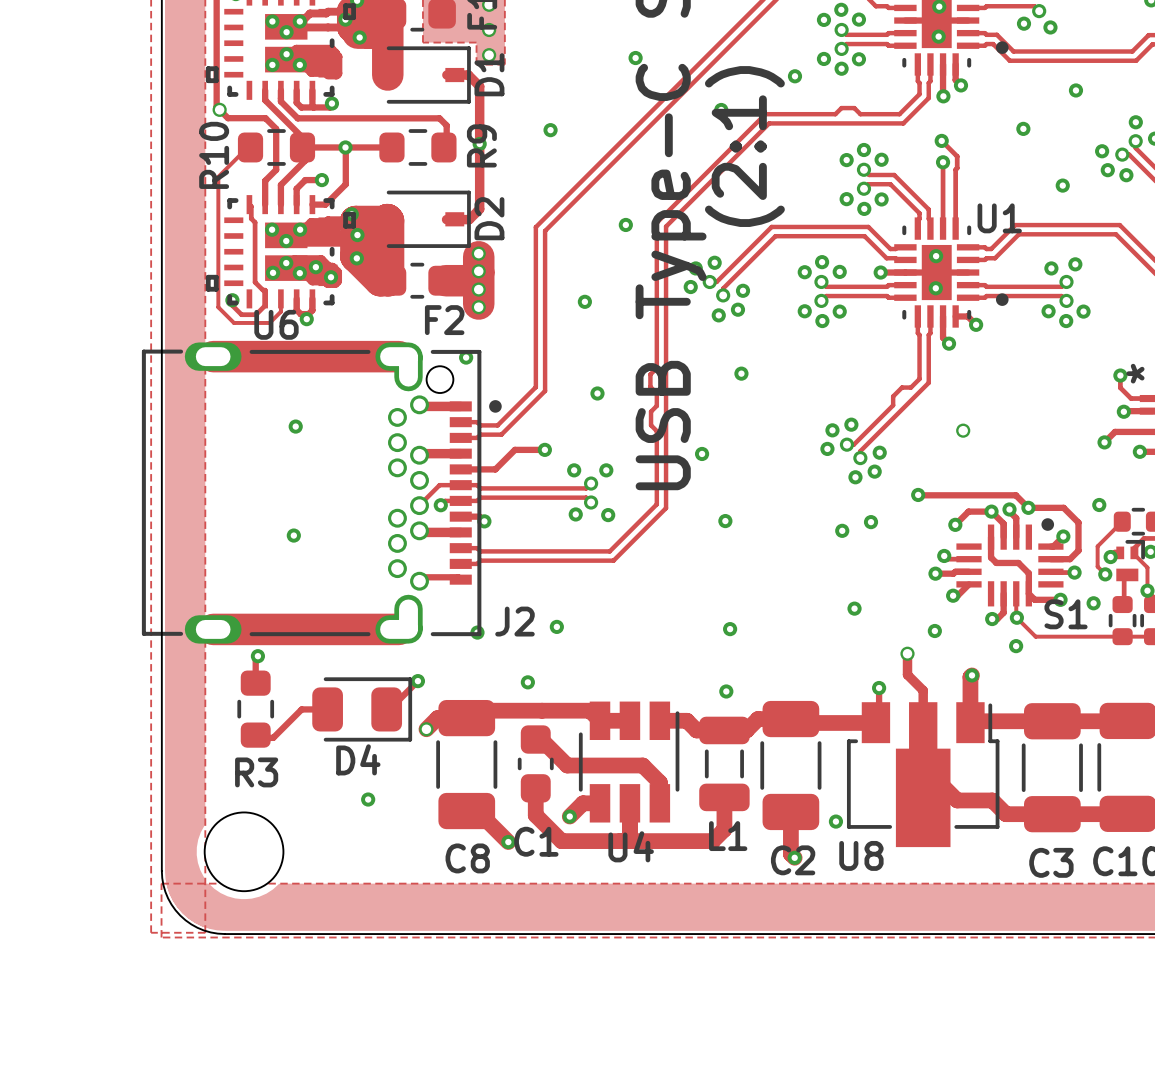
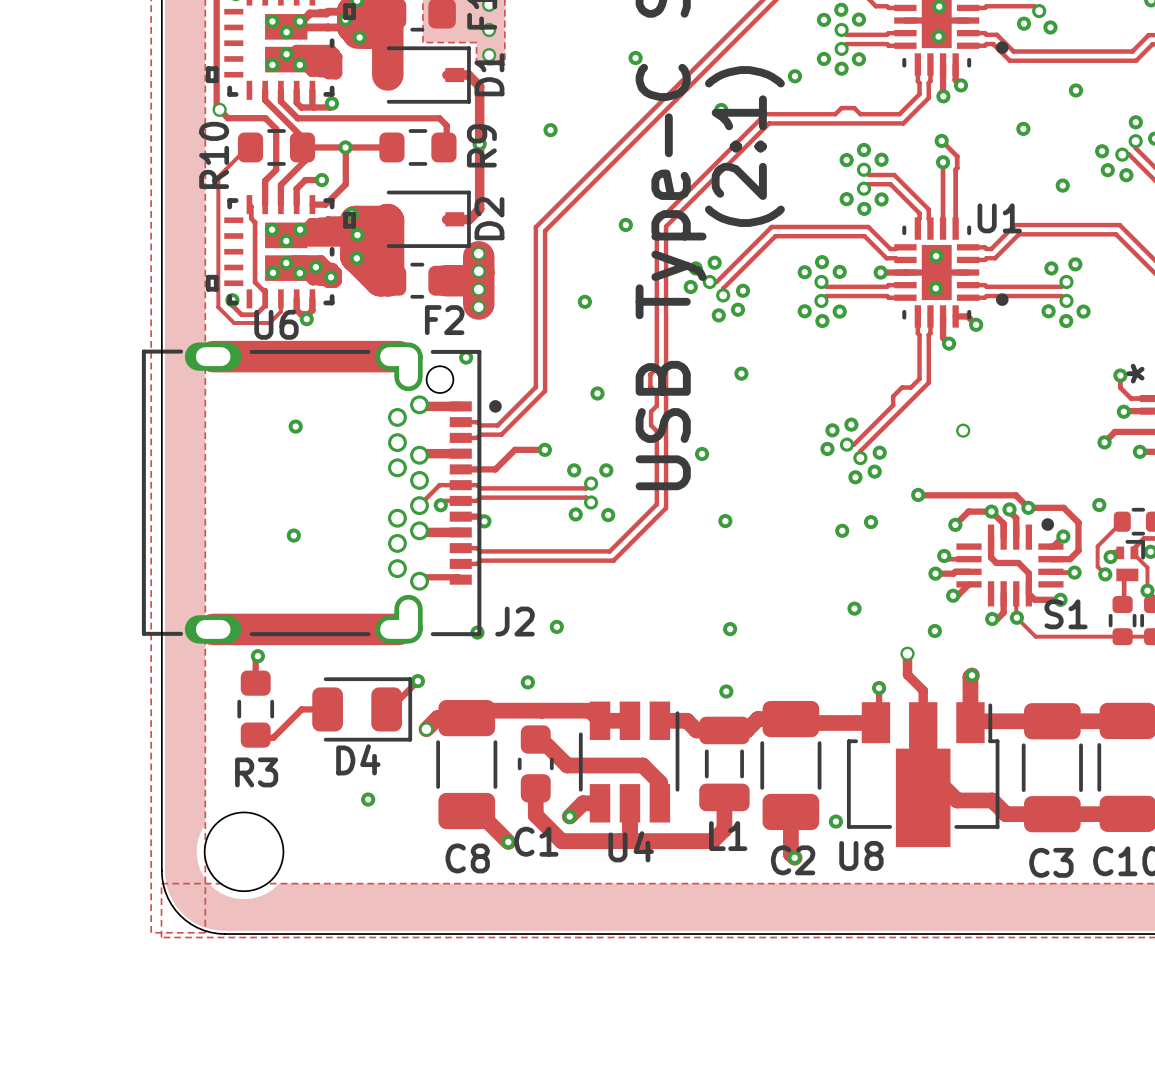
via: (1093, 603) -> none
via: (1016, 646) -> none

